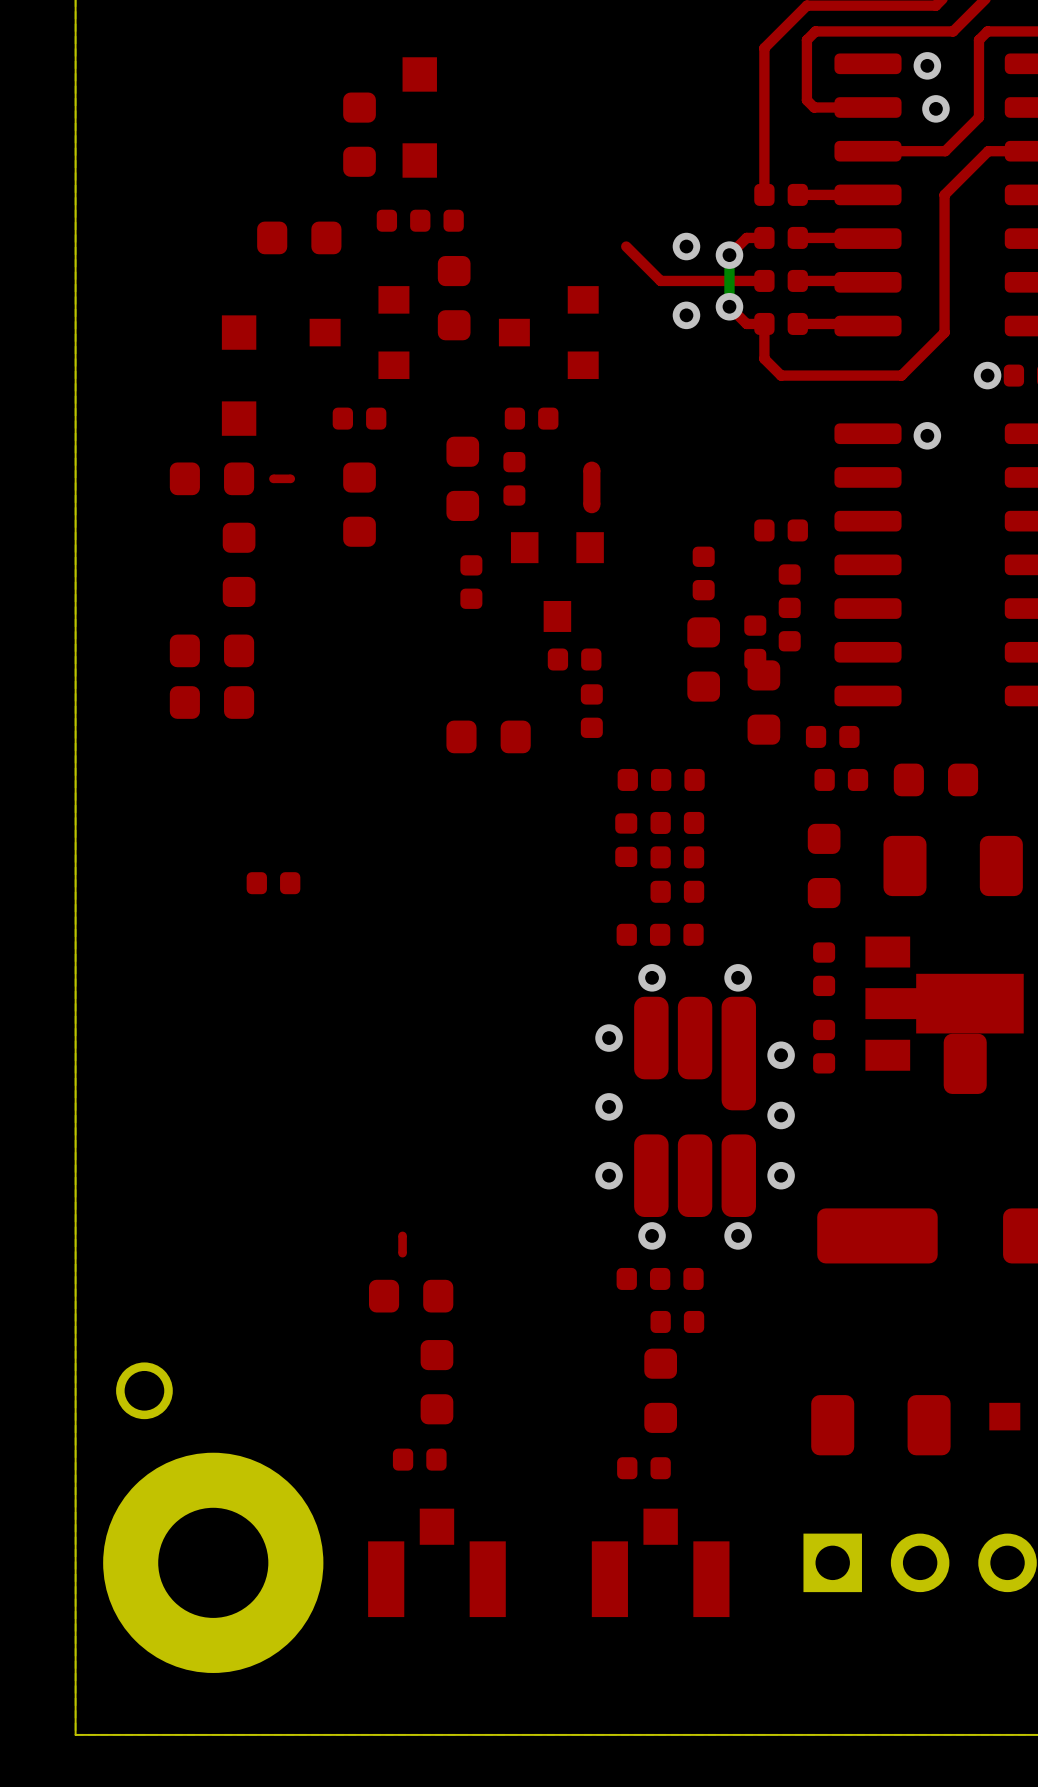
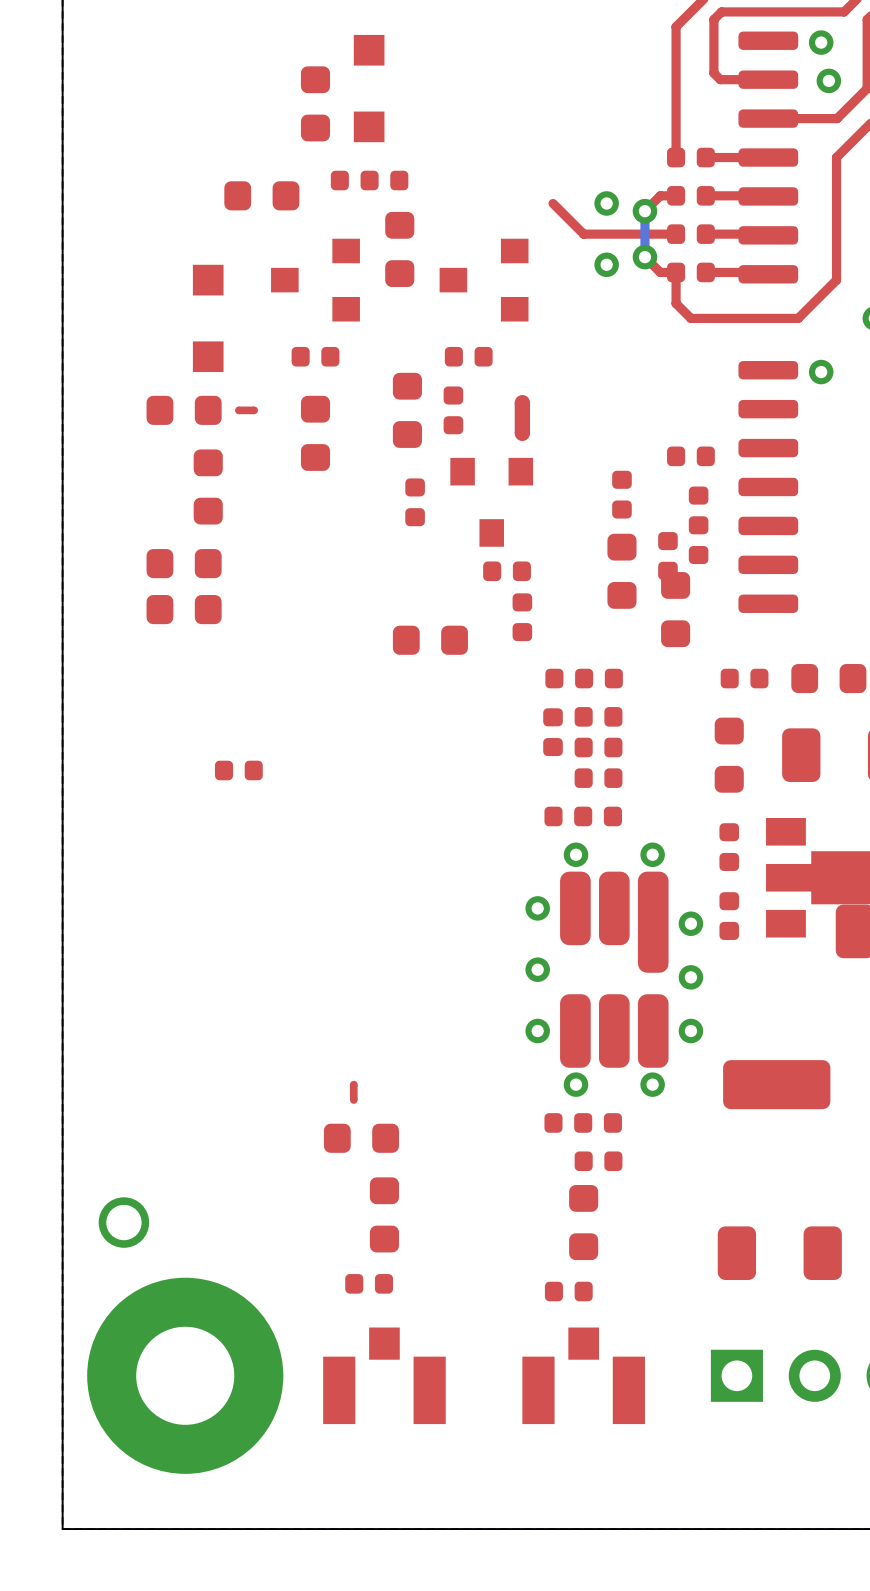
part: (832, 736) -> none

